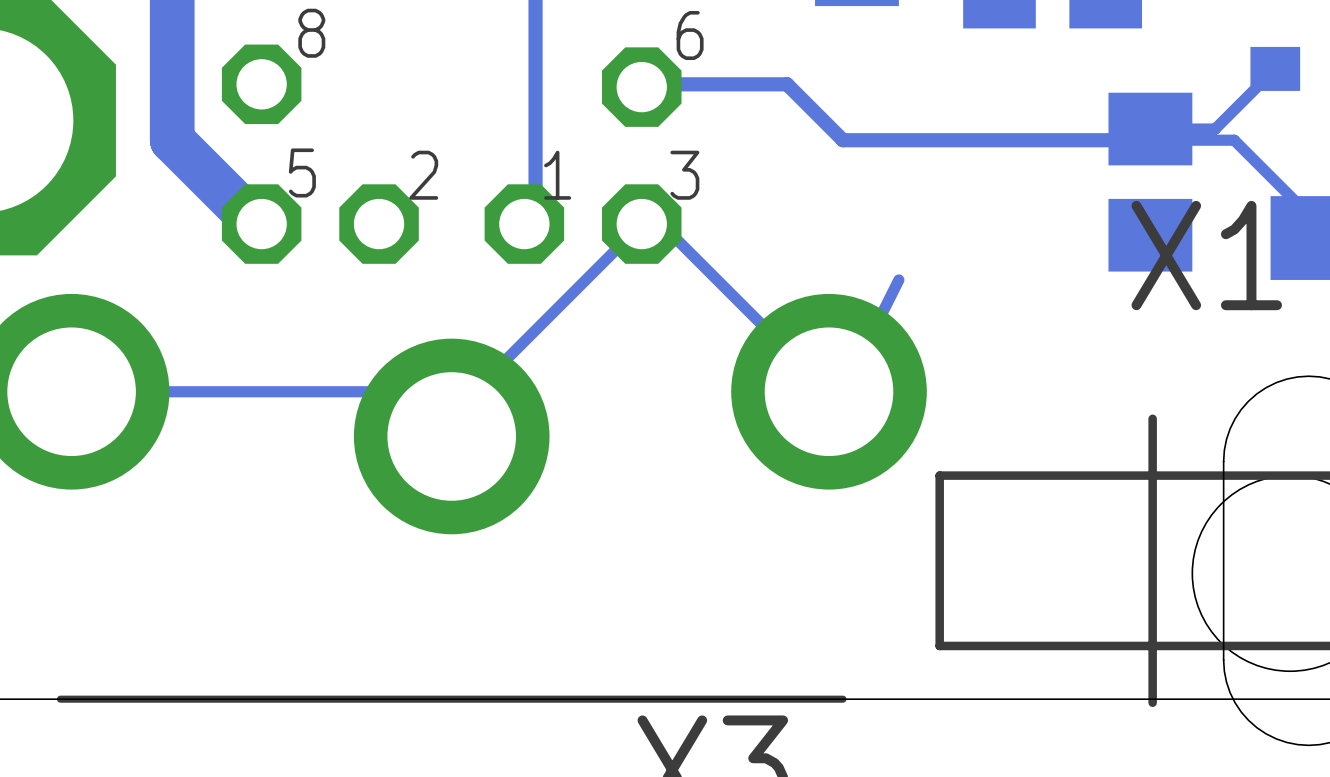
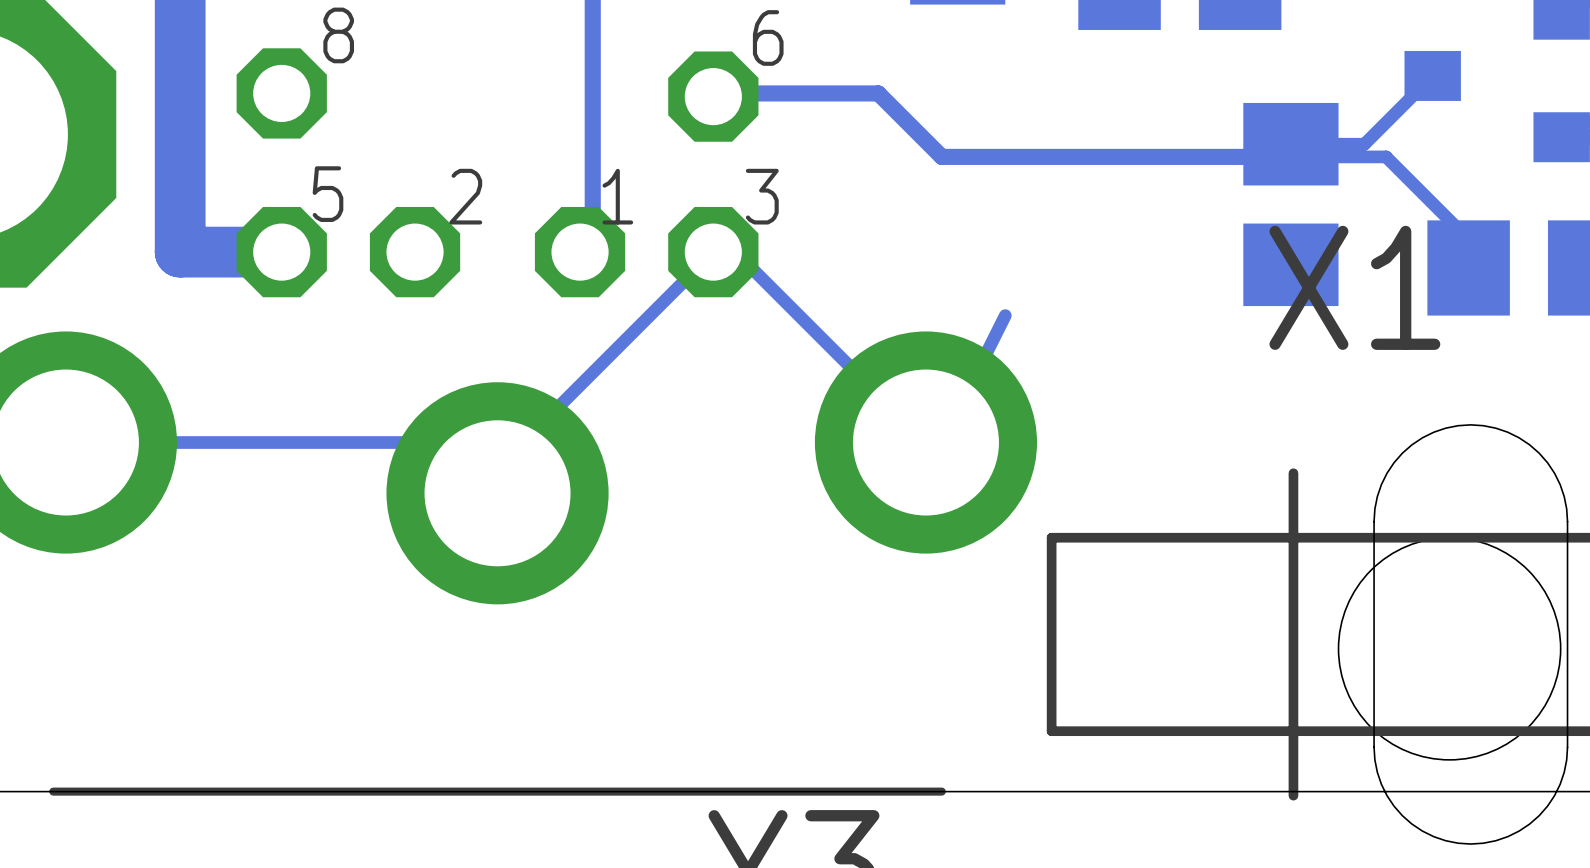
bottom track: (172, 140) (256, 224) -> (180, 156) (180, 252) (275, 252)

